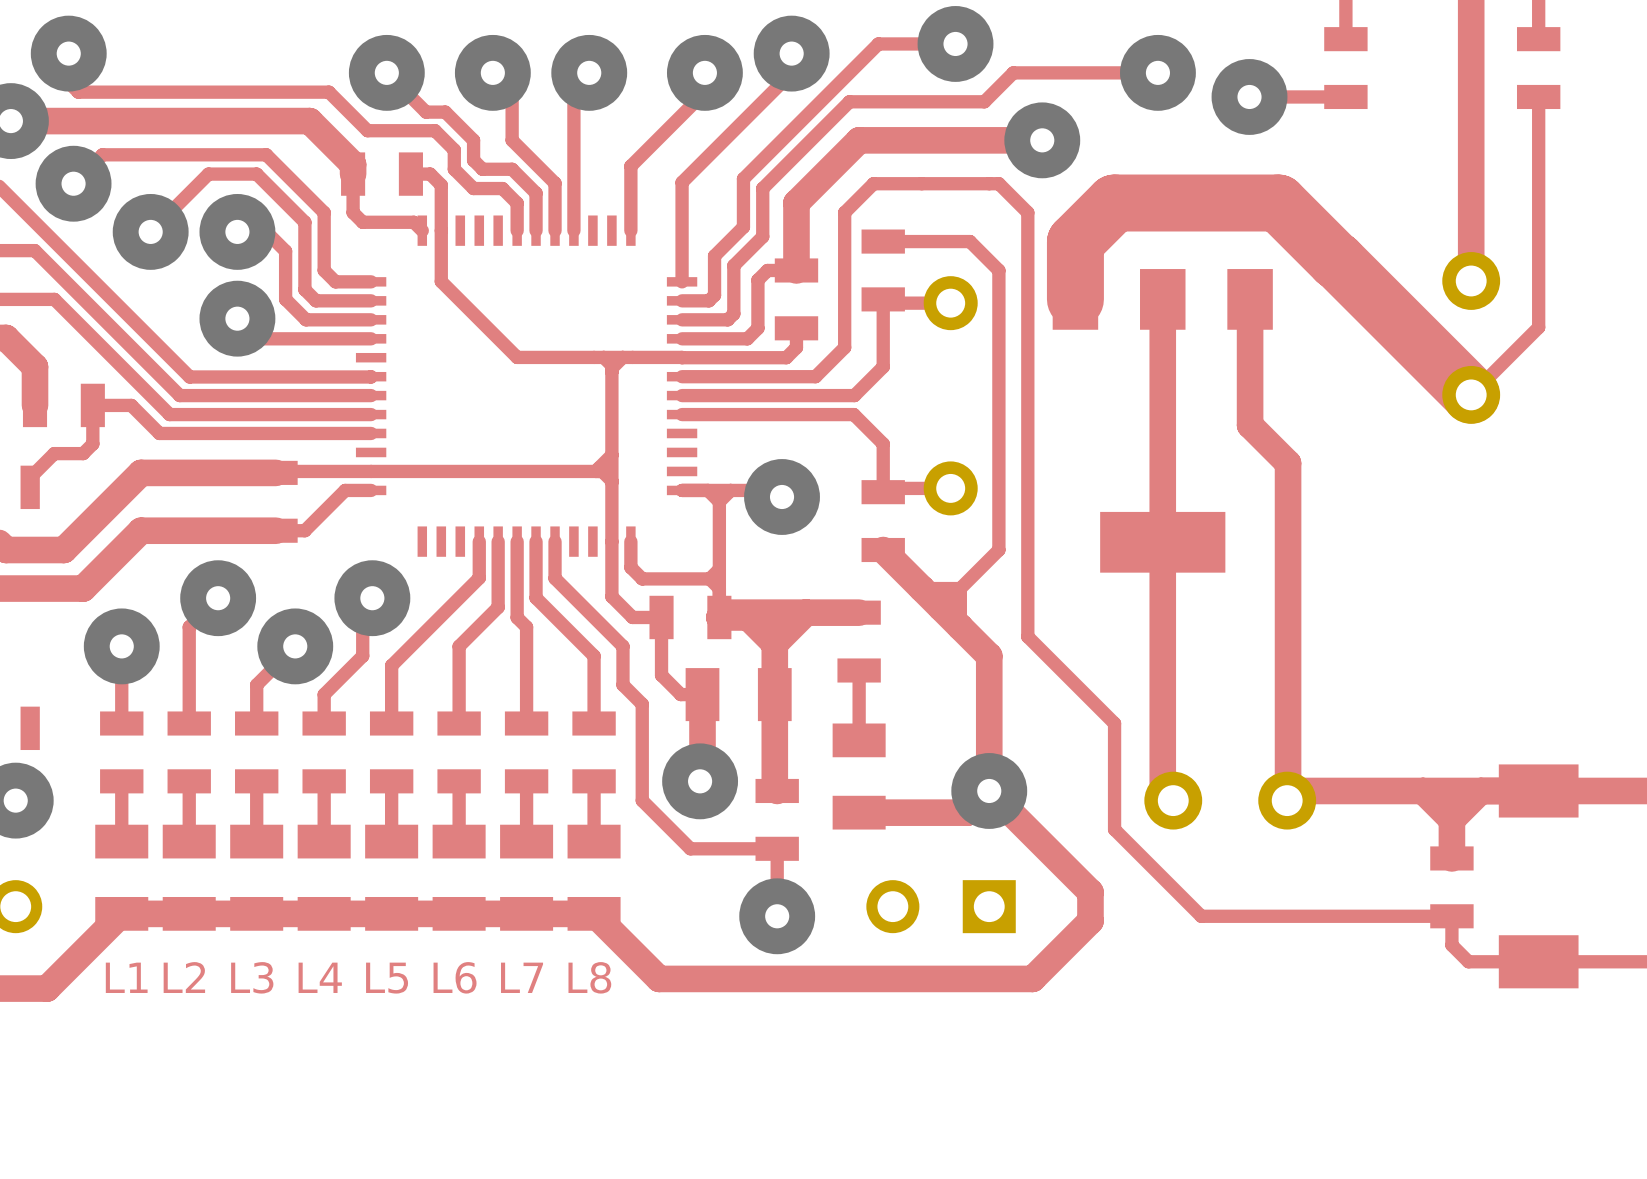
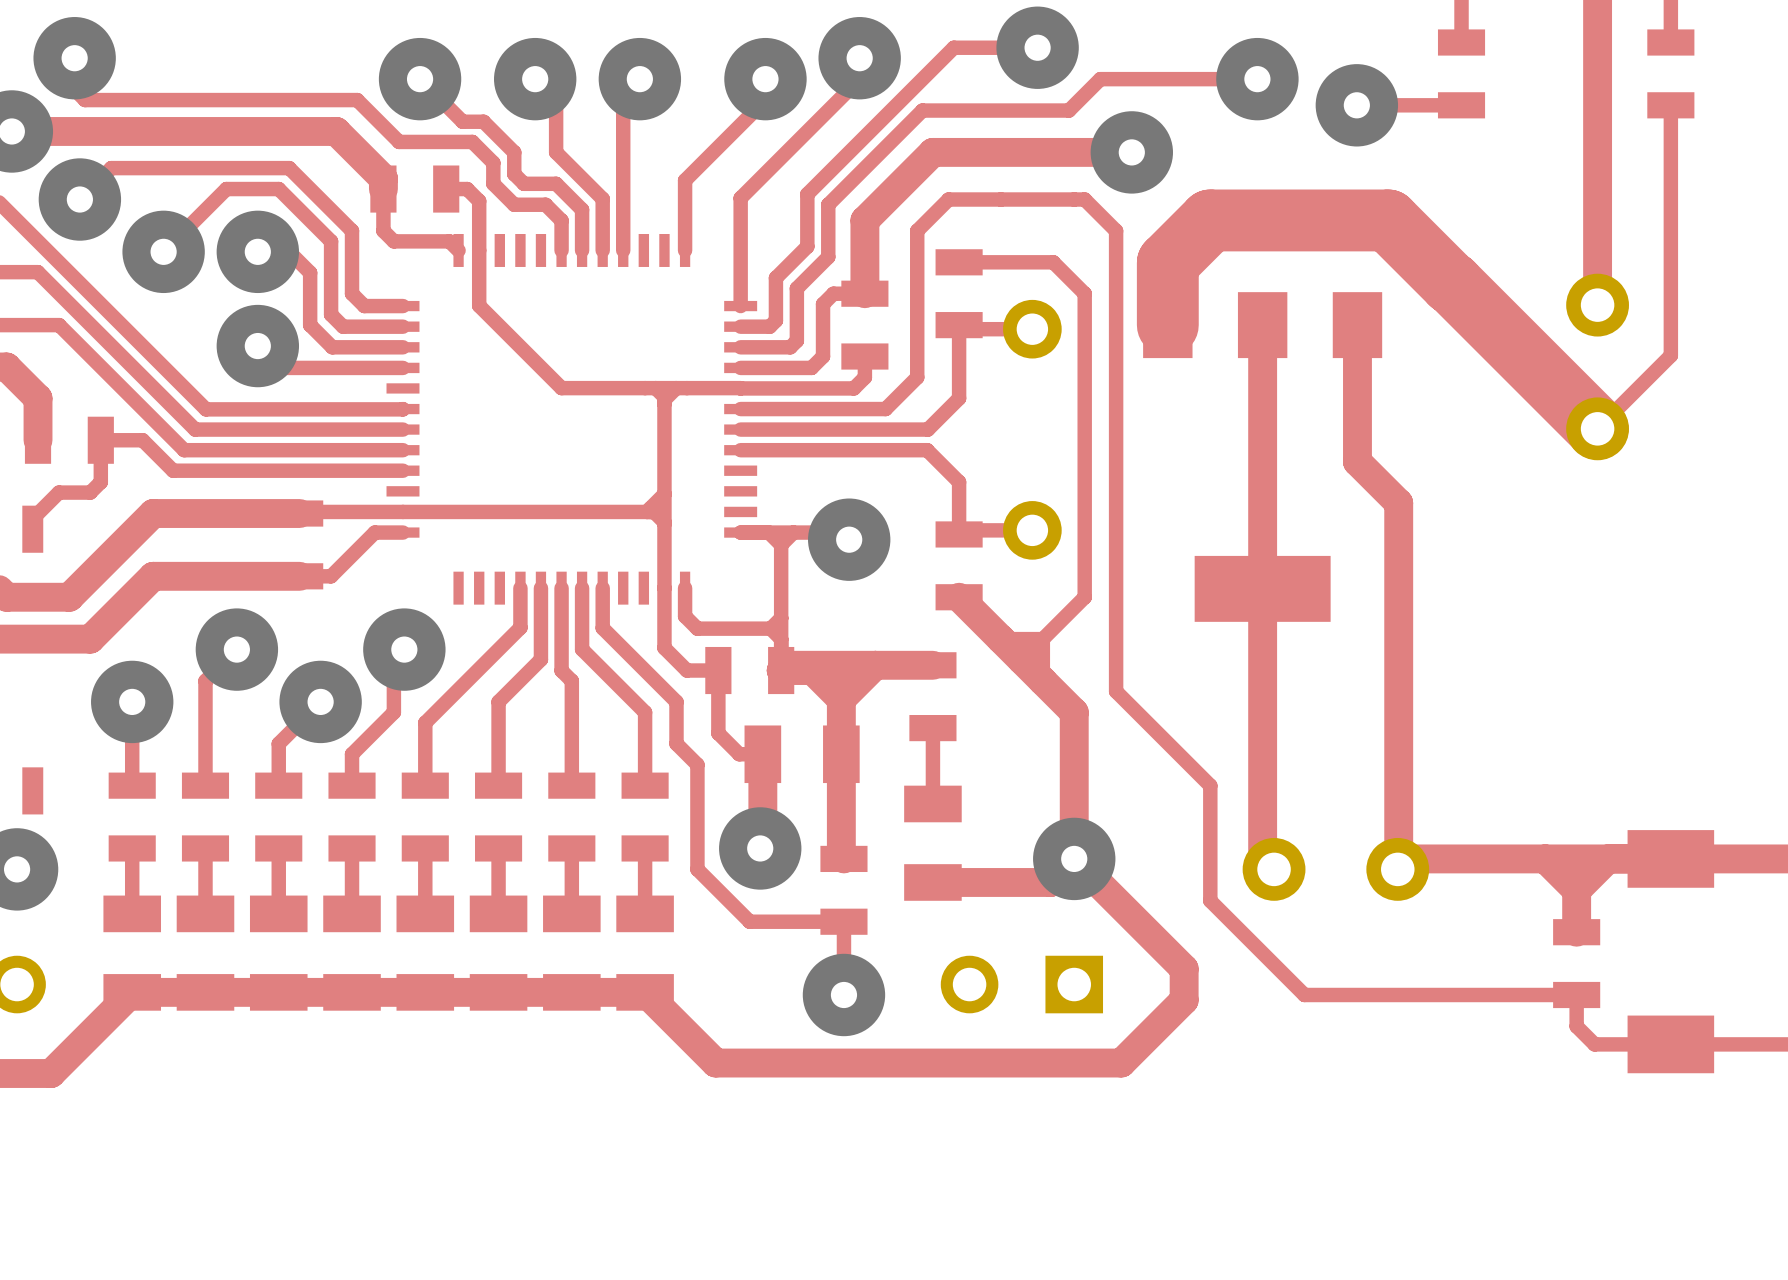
text: L1 (126, 977) -> none
text: L2 (184, 977) -> none
text: L3 (252, 977) -> none
text: L4 (320, 977) -> none
text: L6 (455, 977) -> none
text: L7 (522, 977) -> none
text: L8 (589, 977) -> none
text: L5 (387, 978) -> none

